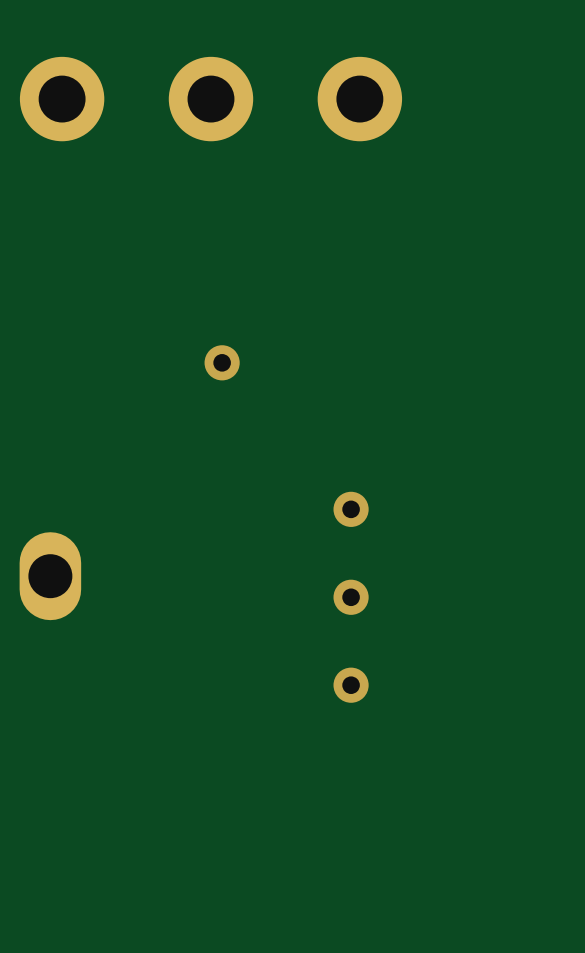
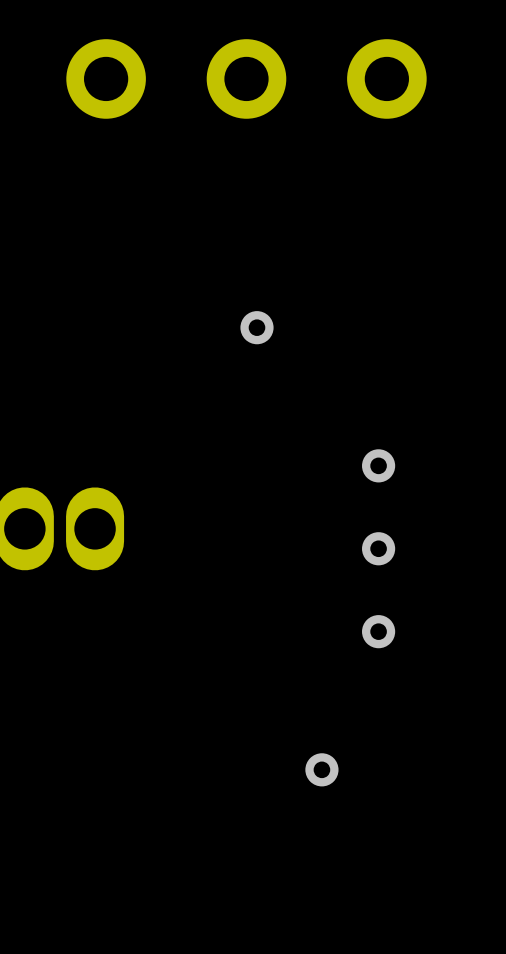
via: none -> (321, 769)

